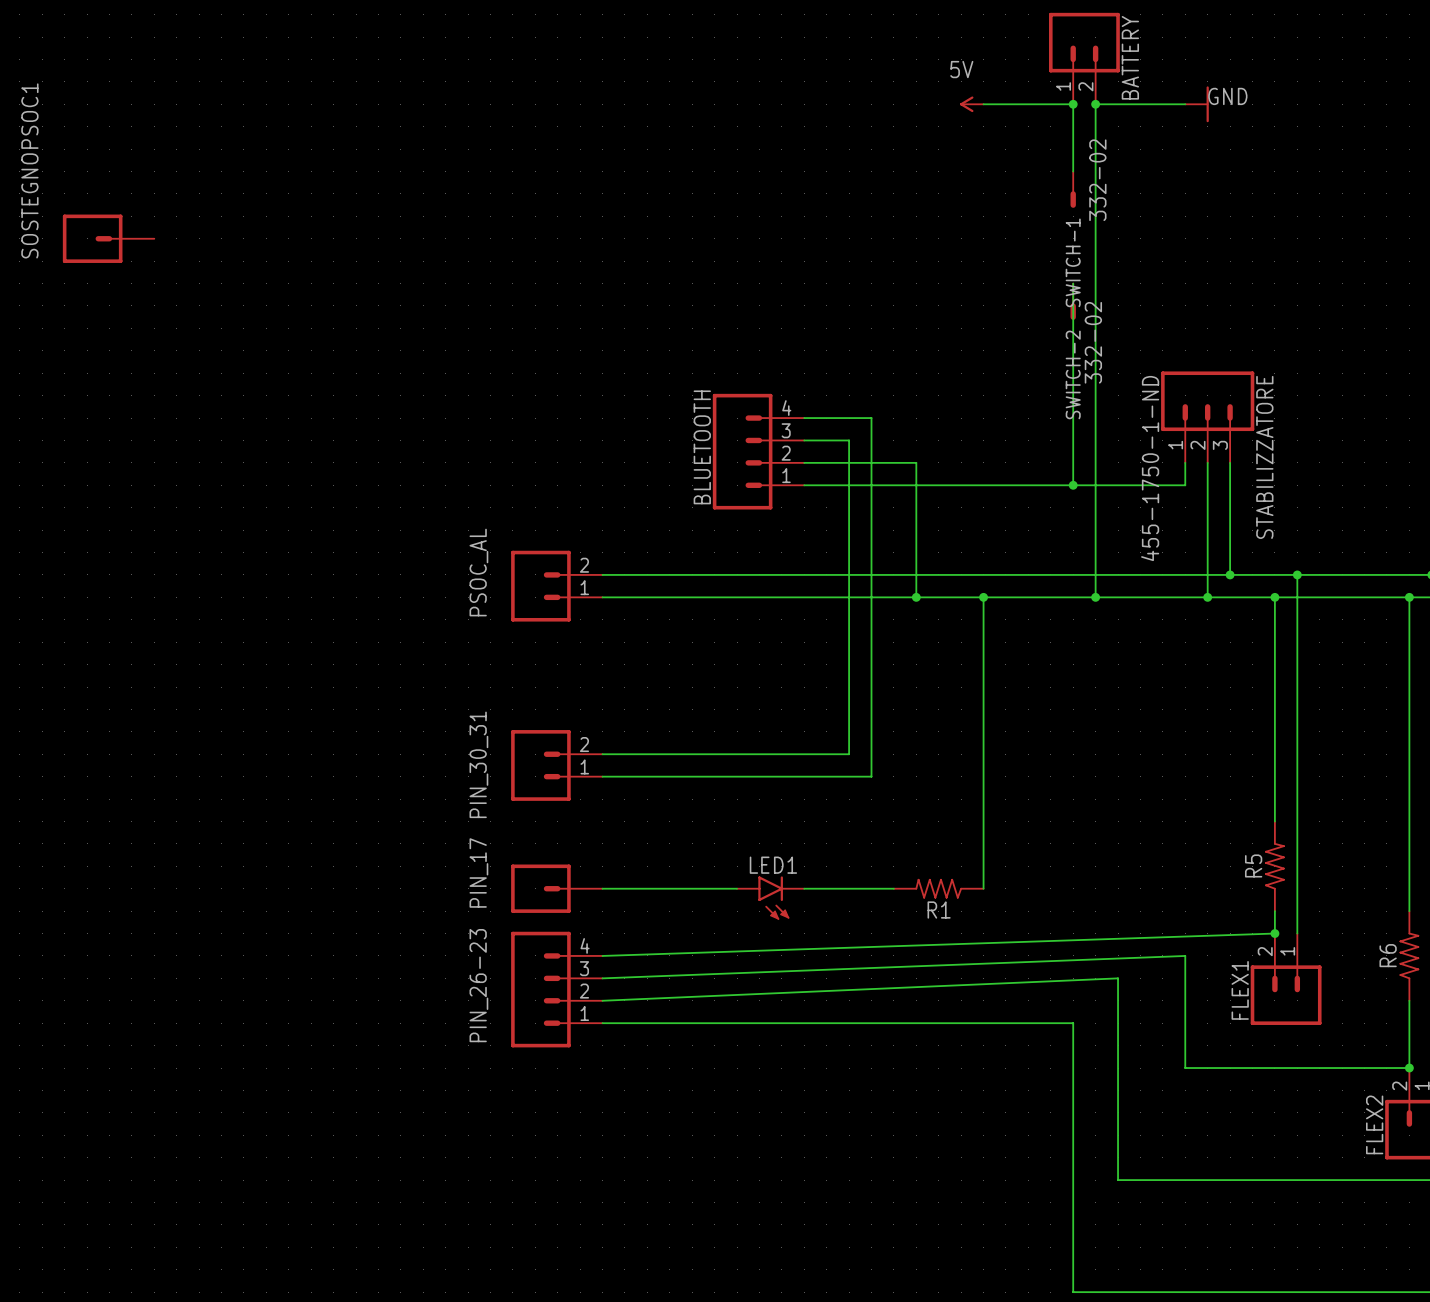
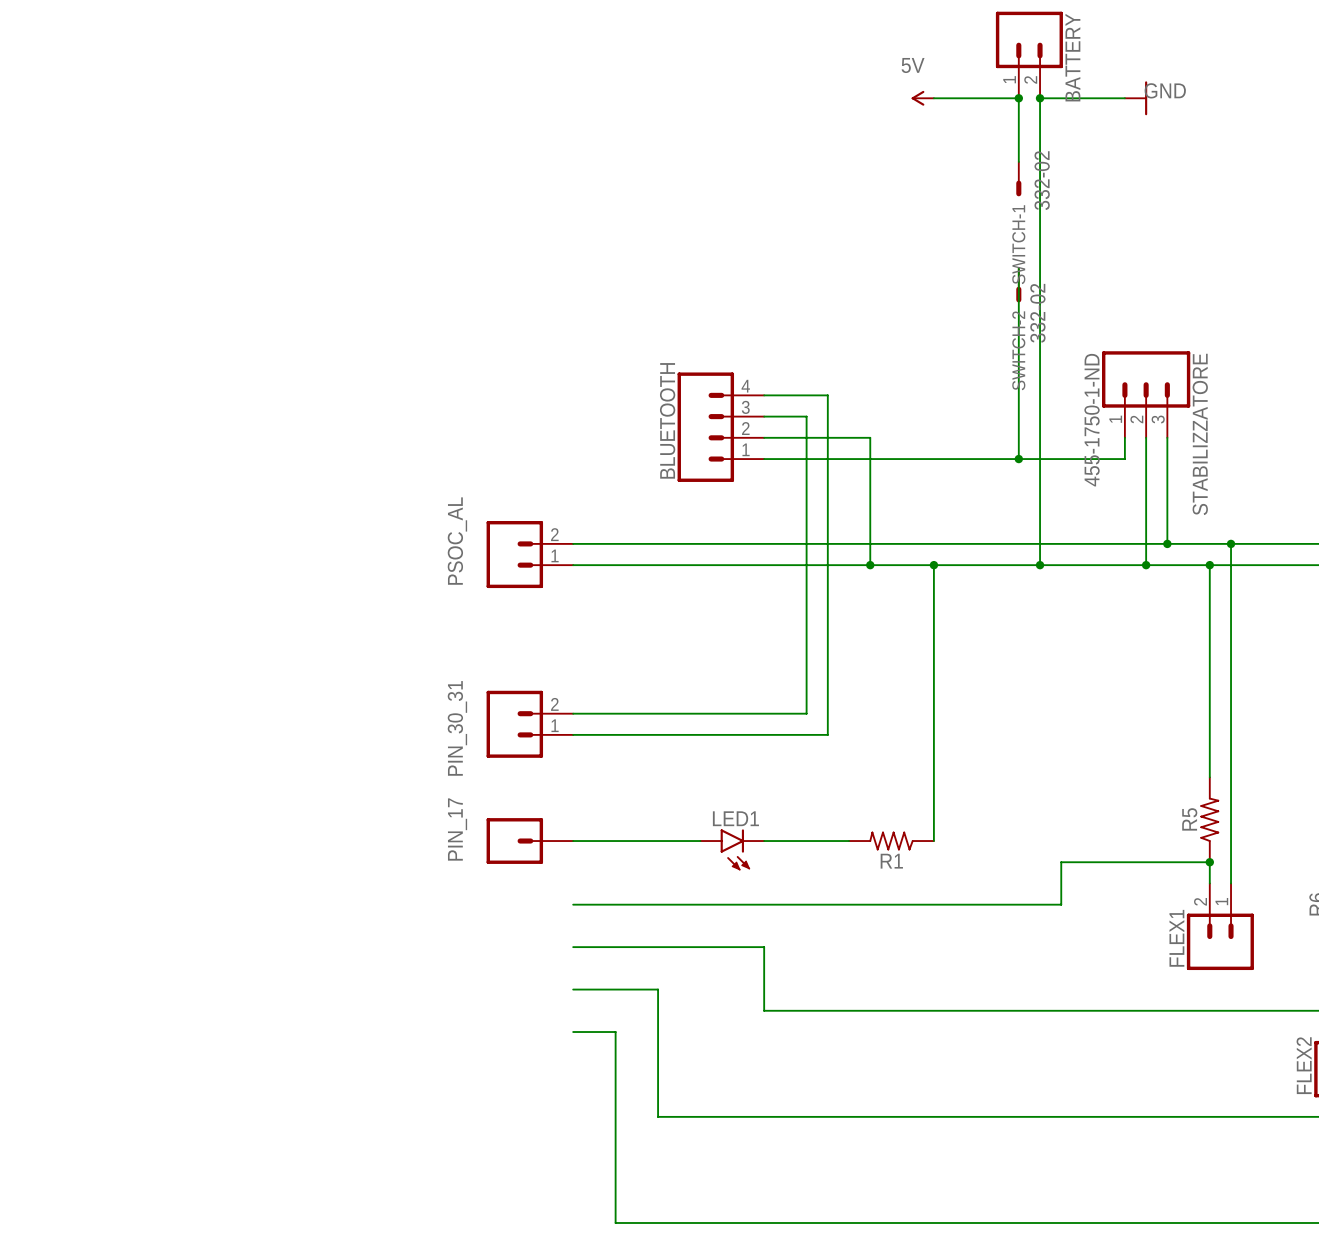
SOSTEGNOPSOC1: (108, 238) -> none
wire: (1274, 933) (602, 955) -> (1209, 862) (1061, 862) (1061, 904) (573, 904)
junction position: (1274, 933) -> (1209, 862)
wire: (602, 978) (1185, 955) (1185, 1068) -> (573, 947) (764, 947) (764, 1010) (1124, 1010)
PIN_26-23: (556, 989) -> none
wire: (602, 1000) (1118, 978) (1118, 1180) -> (573, 989) (658, 989) (658, 1116) (1061, 1116)
wire: (602, 1023) (1073, 1023) (1073, 1292) -> (573, 1032) (615, 1032) (615, 1222) (1018, 1222)

